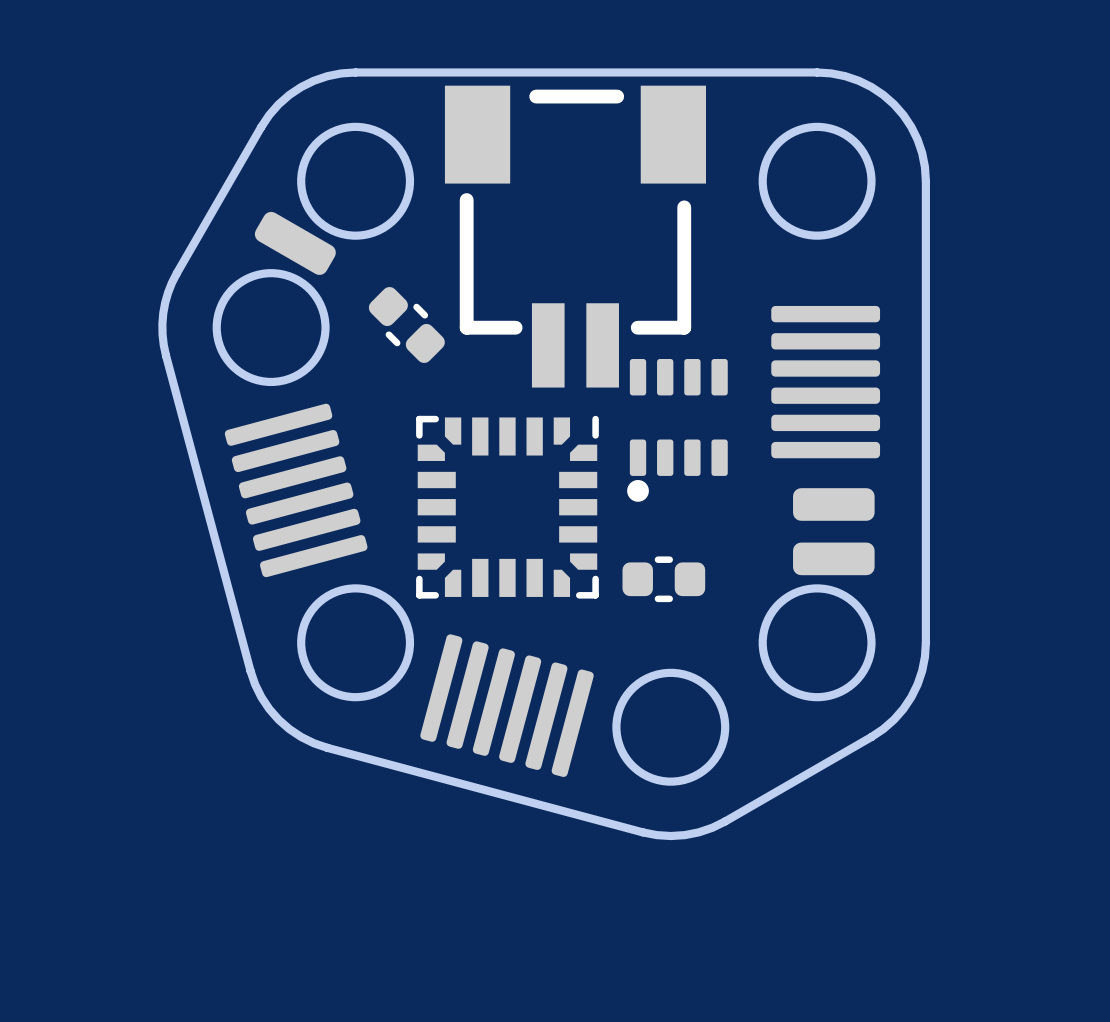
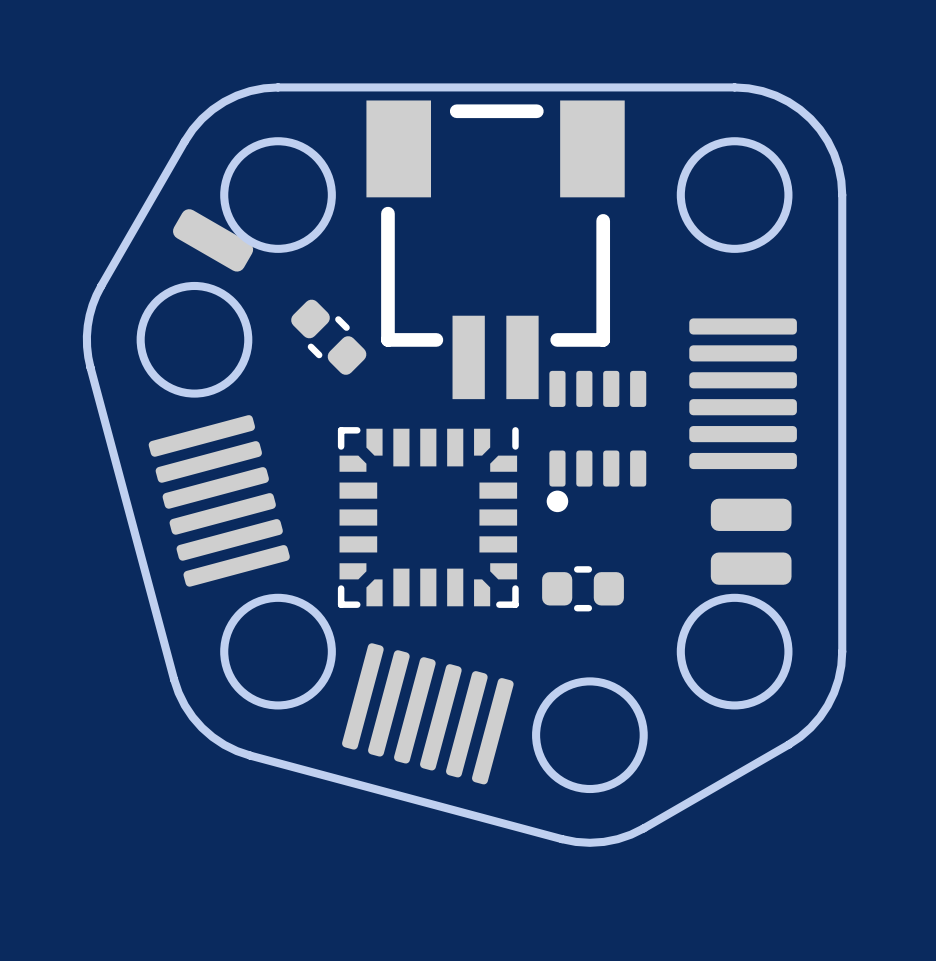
part position: (295, 243) -> (213, 240)

